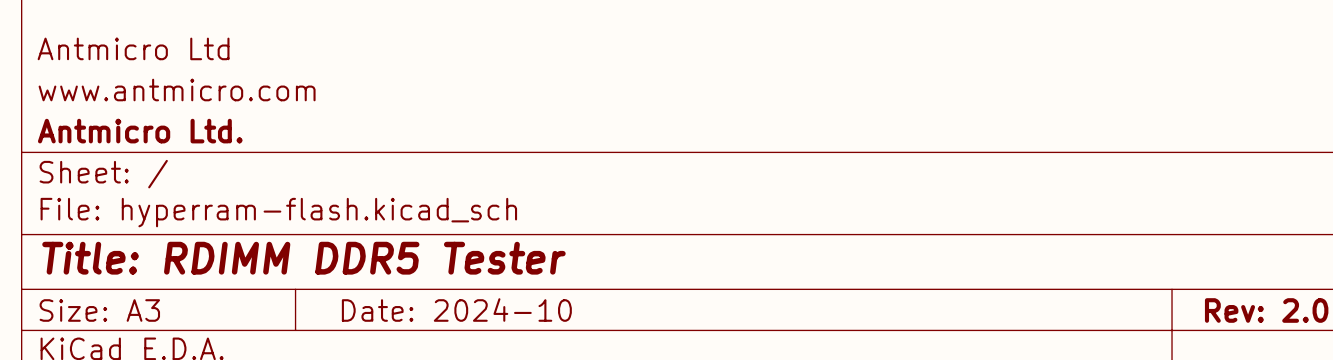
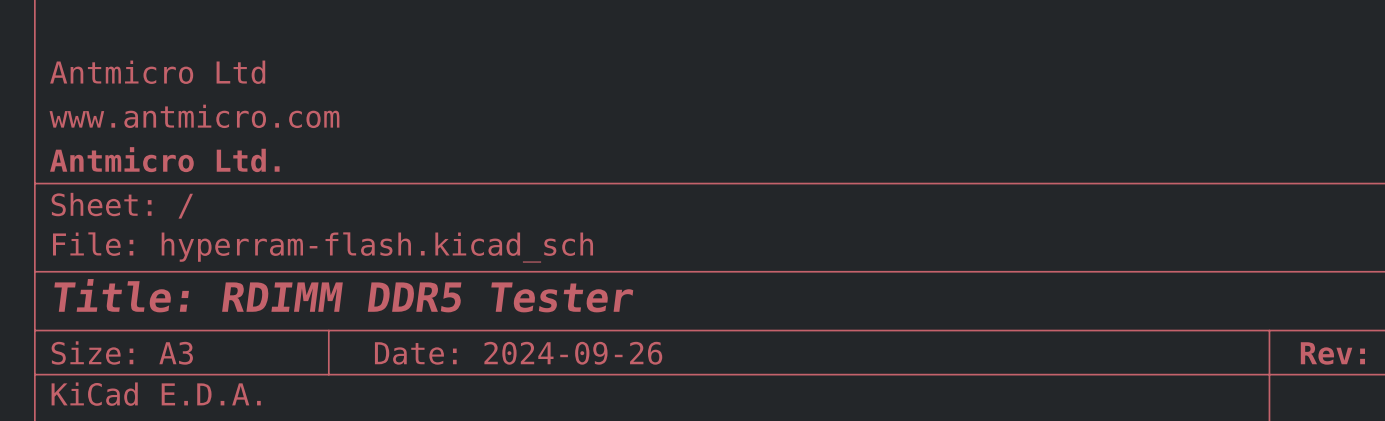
title block: Date: 2024-10 (456, 310) -> Date: 2024-09-26 (518, 353)

